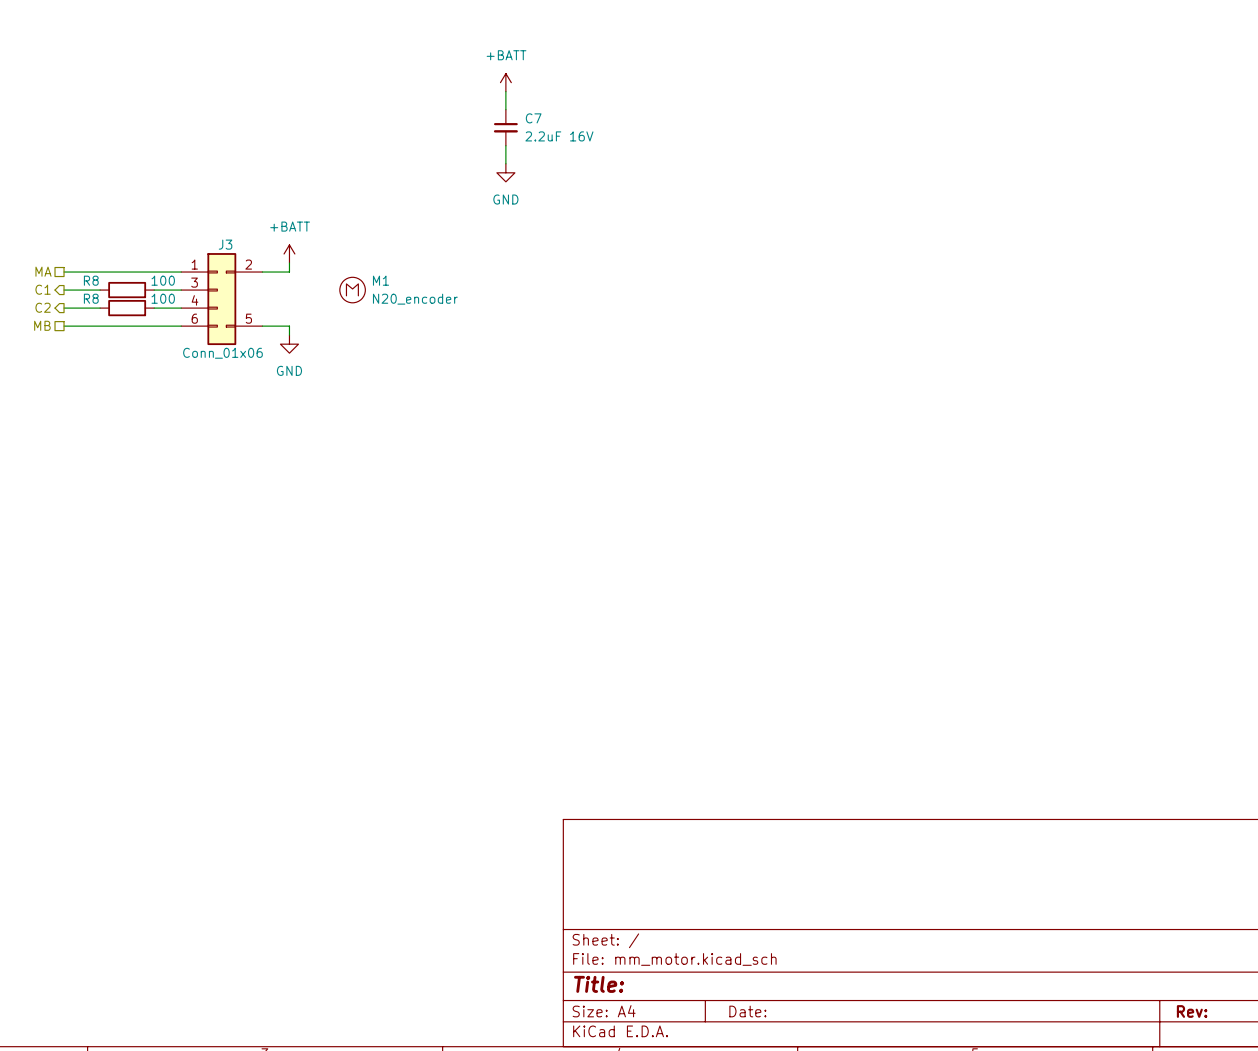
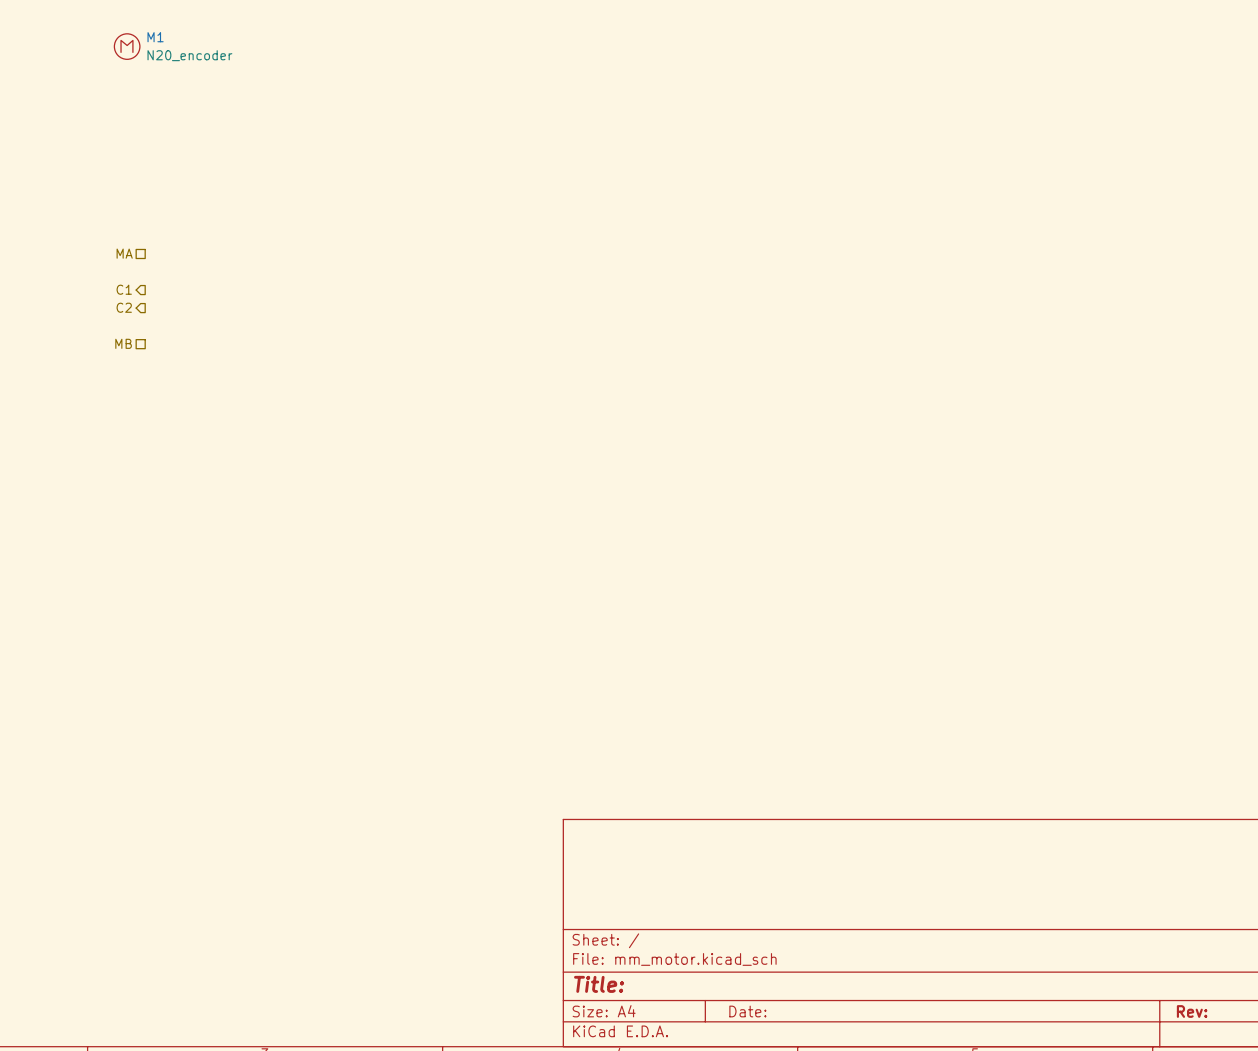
power symbol: +BATT (505, 82) -> none
wire: (505, 91) (505, 109) -> none
C7: 2.2uF 16V (505, 127) -> none
wire: (505, 145) (505, 163) -> none
power symbol: GND (505, 172) -> none
power symbol: +BATT (289, 253) -> none
wire: (289, 263) (289, 272) (262, 272) -> none
hierarchical label position: MA (43, 271) -> MA (124, 253)
wire: (64, 272) (181, 272) -> none
hierarchical label position: C1 (43, 289) -> C1 (124, 289)
wire: (64, 290) (100, 290) -> none
R8: 100 (127, 290) -> none
wire: (154, 290) (181, 290) -> none
M1 position: (352, 290) -> (127, 46)
J3: Conn_01x06 (221, 299) -> none
hierarchical label position: C2 (43, 307) -> C2 (124, 307)
wire: (64, 308) (100, 308) -> none
R8: 100 (127, 308) -> none
wire: (154, 308) (181, 308) -> none
hierarchical label position: MB (42, 325) -> MB (123, 343)
wire: (64, 326) (181, 326) -> none
wire: (262, 326) (289, 326) (289, 335) -> none
power symbol: GND (289, 344) -> none

